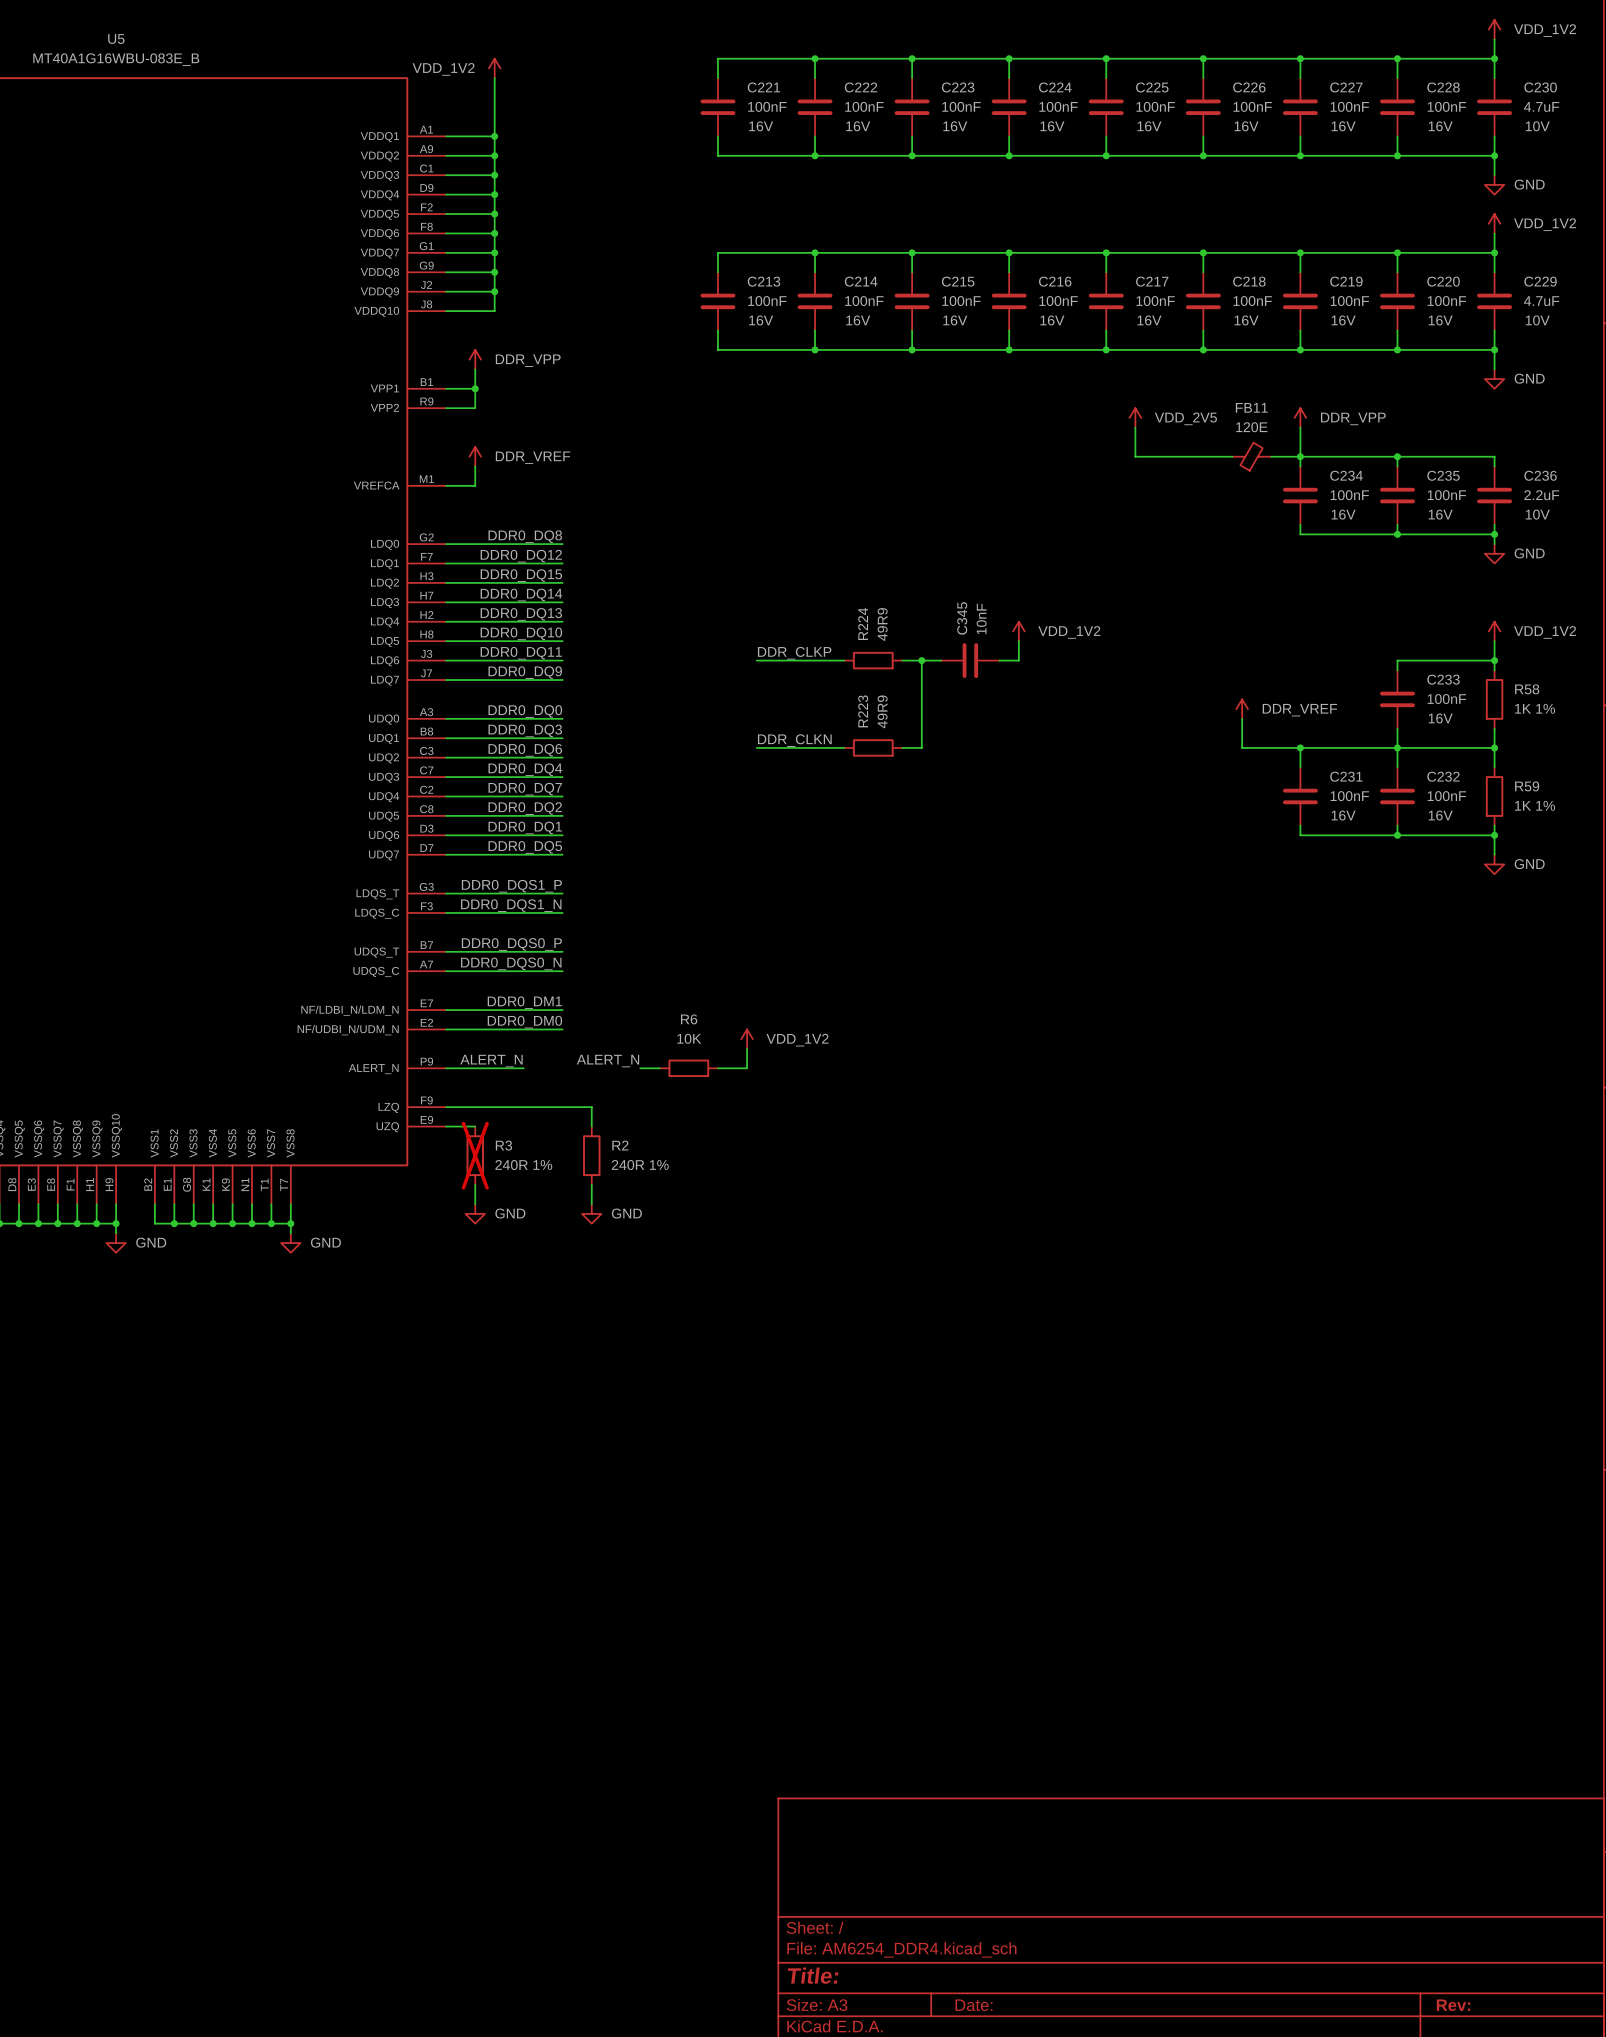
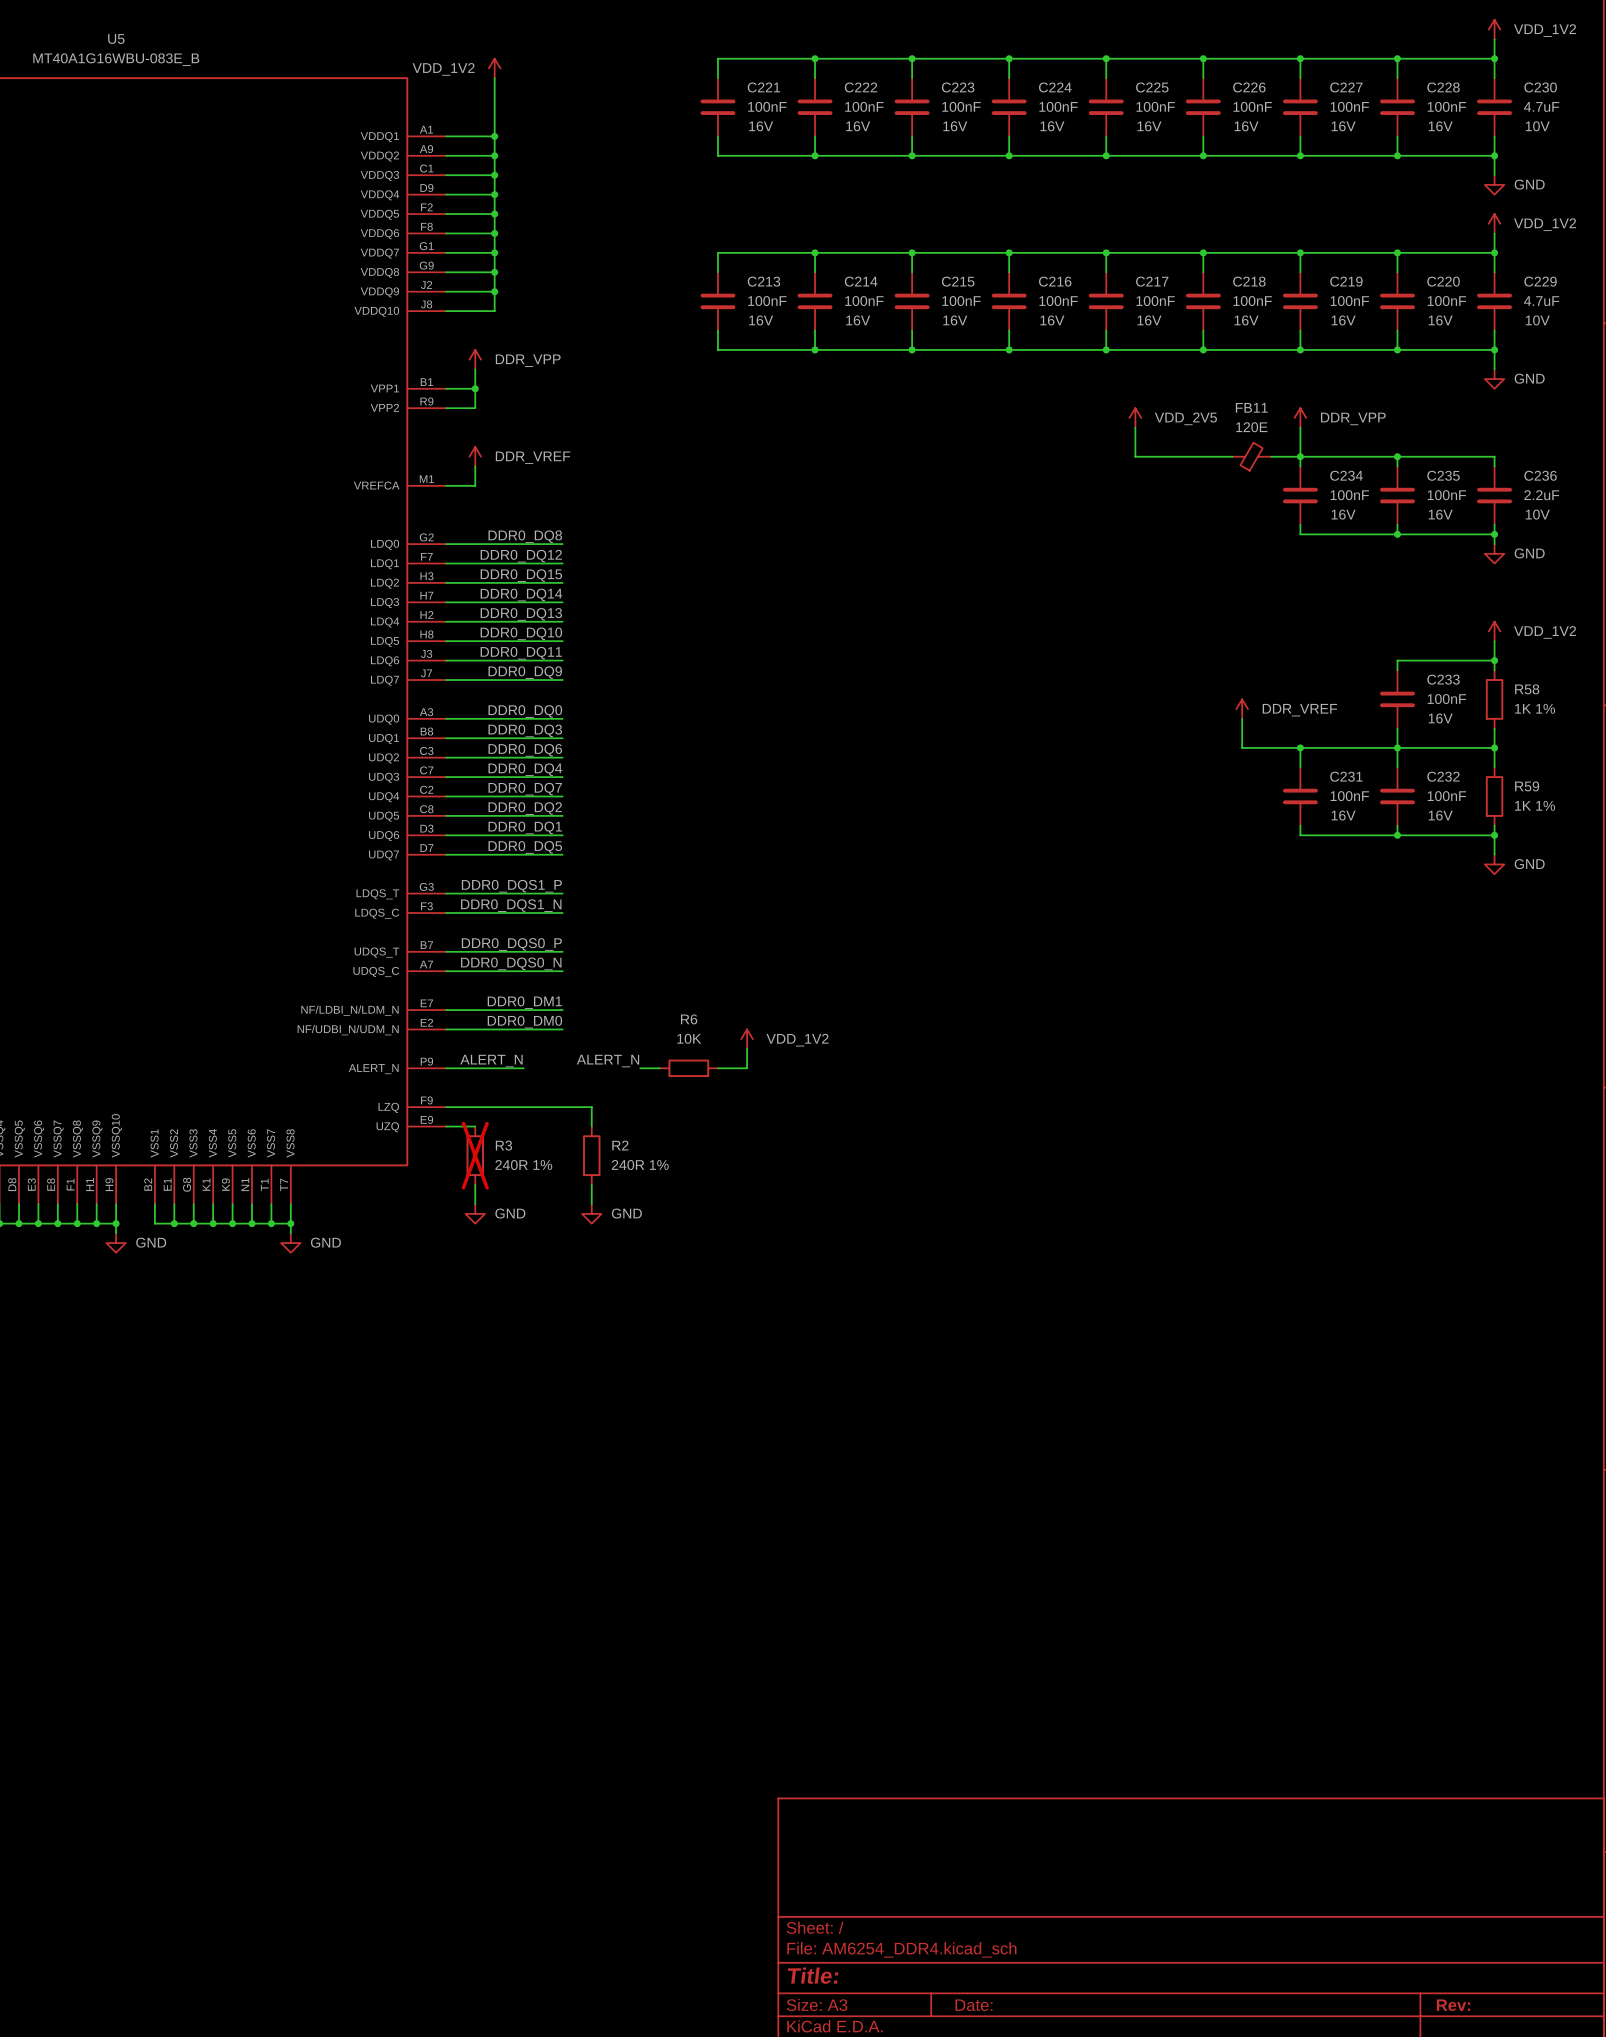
power symbol: VDD_1V2 (1018, 631) -> none
wire: (1018, 641) (1018, 660) (999, 660) -> none
label: DDR_CLKP (794, 653) -> none
wire: (756, 660) (844, 660) -> none
R224: 49R9 (873, 660) -> none
wire: (902, 660) (941, 660) -> none
wire: (921, 660) (921, 747) (902, 747) -> none
junction: (921, 660) -> none
C345: 10nF (970, 660) -> none
label: DDR_CLKN (794, 740) -> none
wire: (756, 747) (844, 747) -> none
R223: 49R9 (873, 747) -> none

